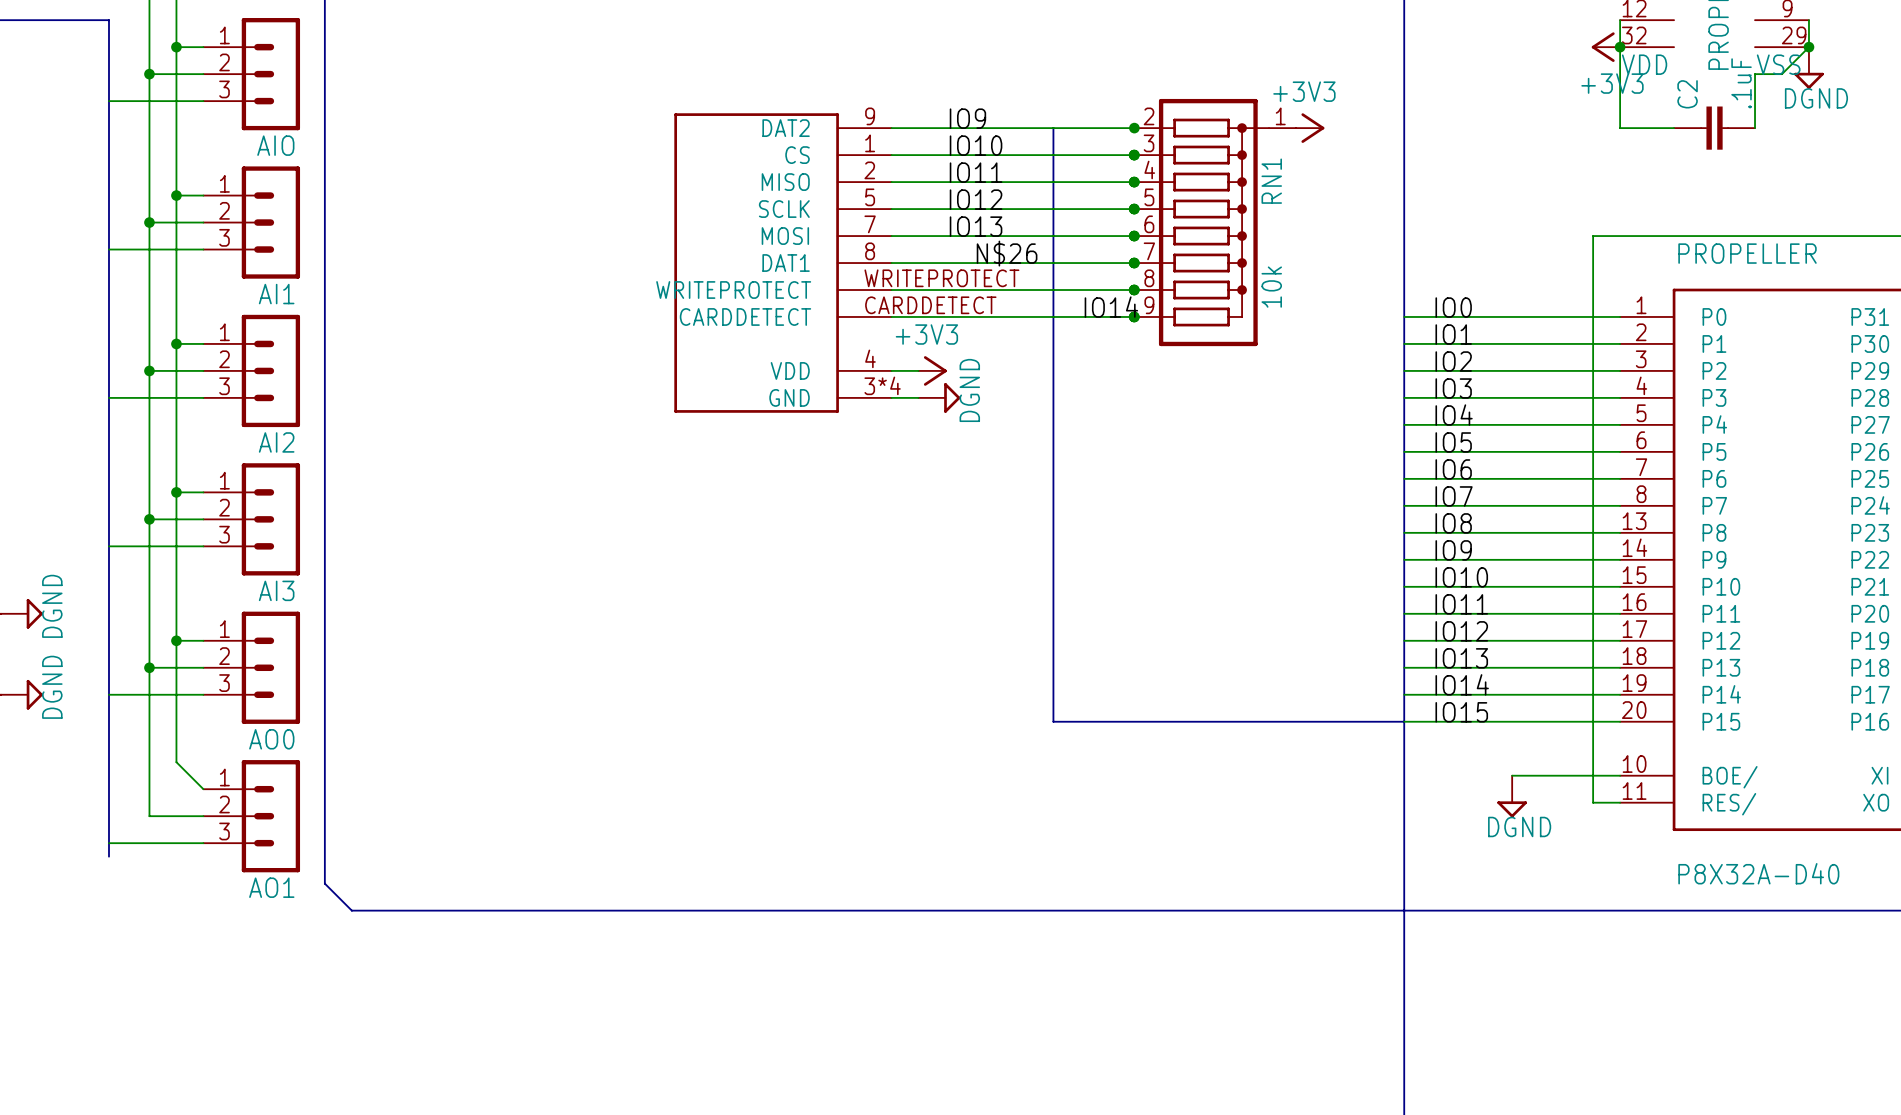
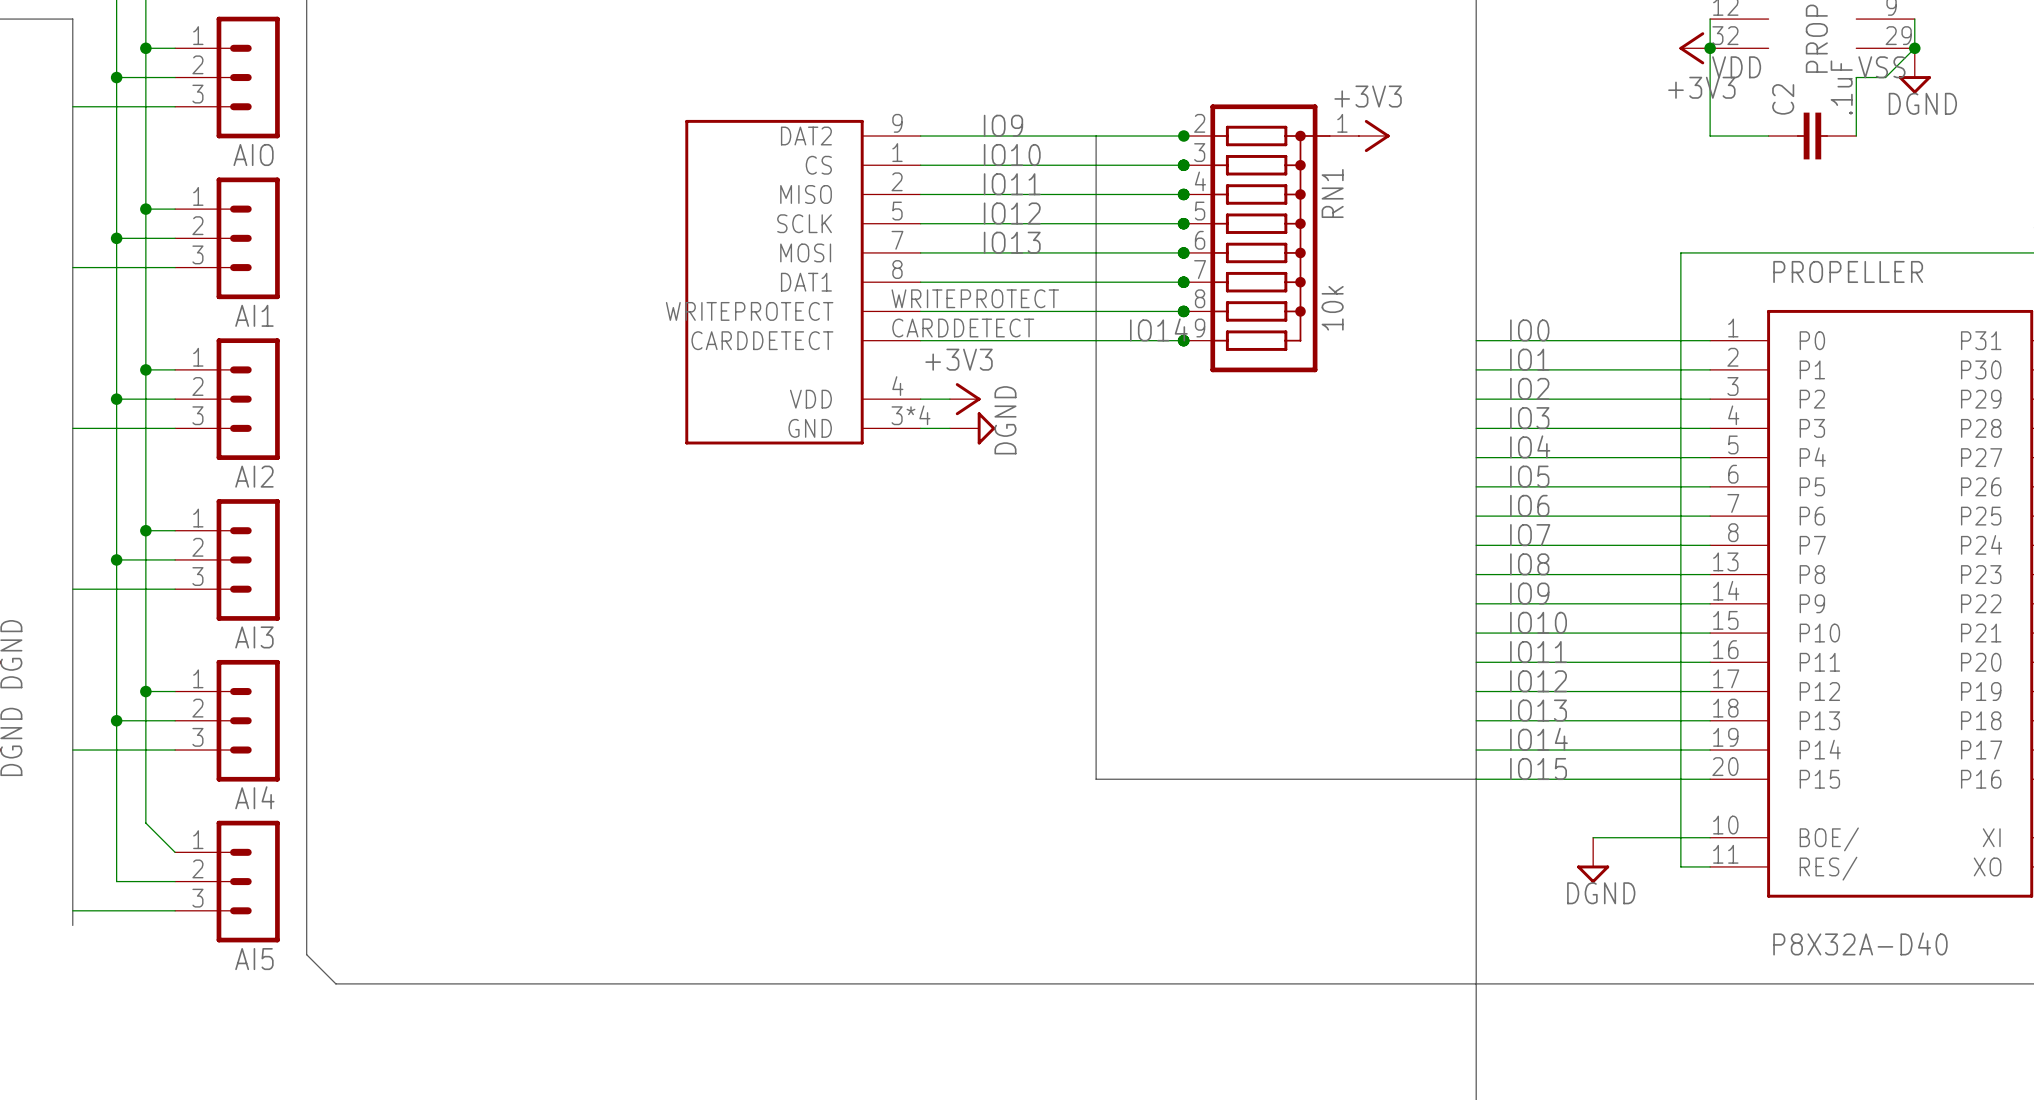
label: N$26 (1007, 253) -> none
AO0 name: AO0 (271, 739) -> AI4 (254, 797)
AO1 name: AO1 (271, 887) -> AI5 (254, 959)

